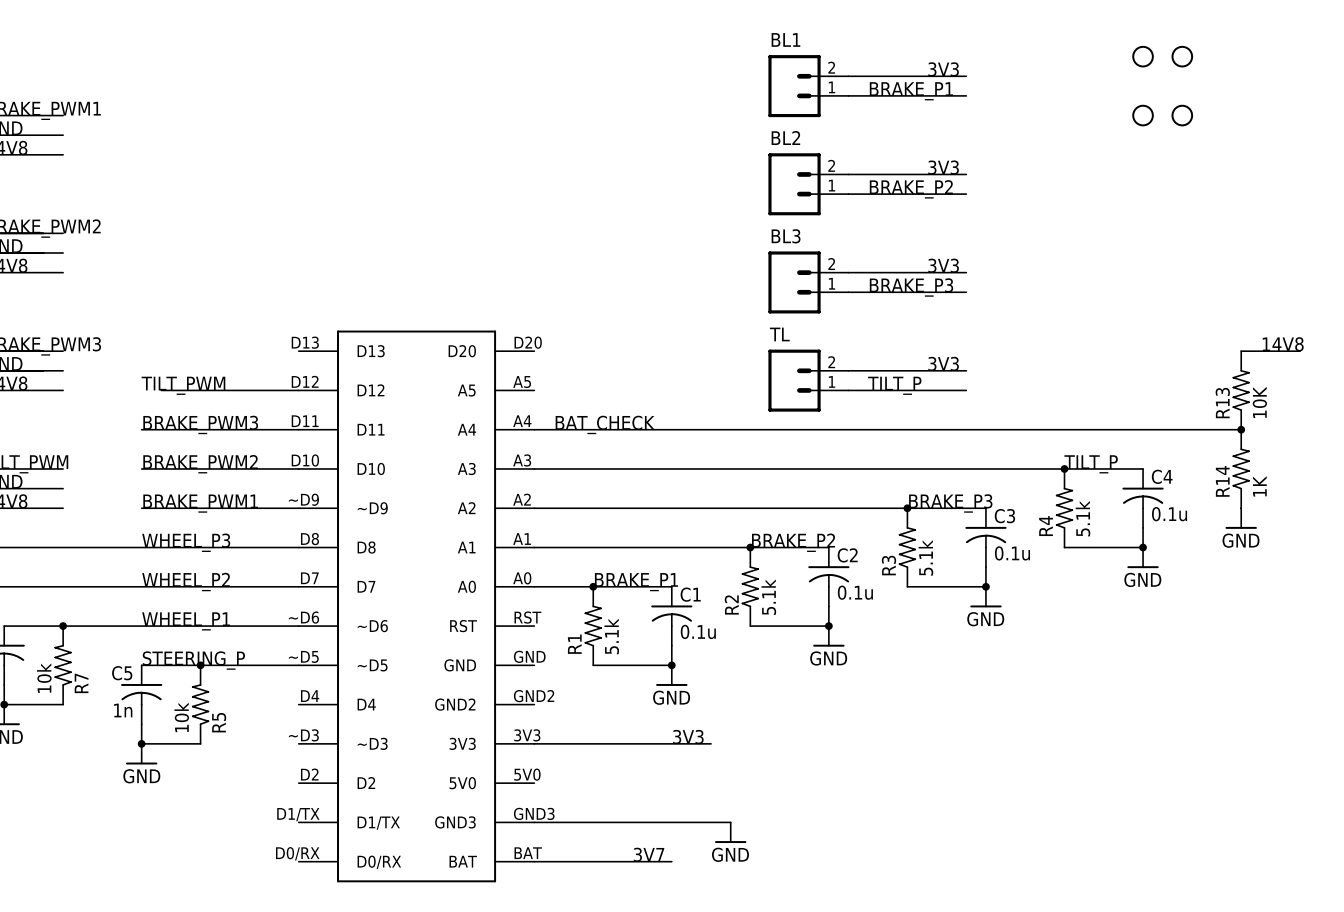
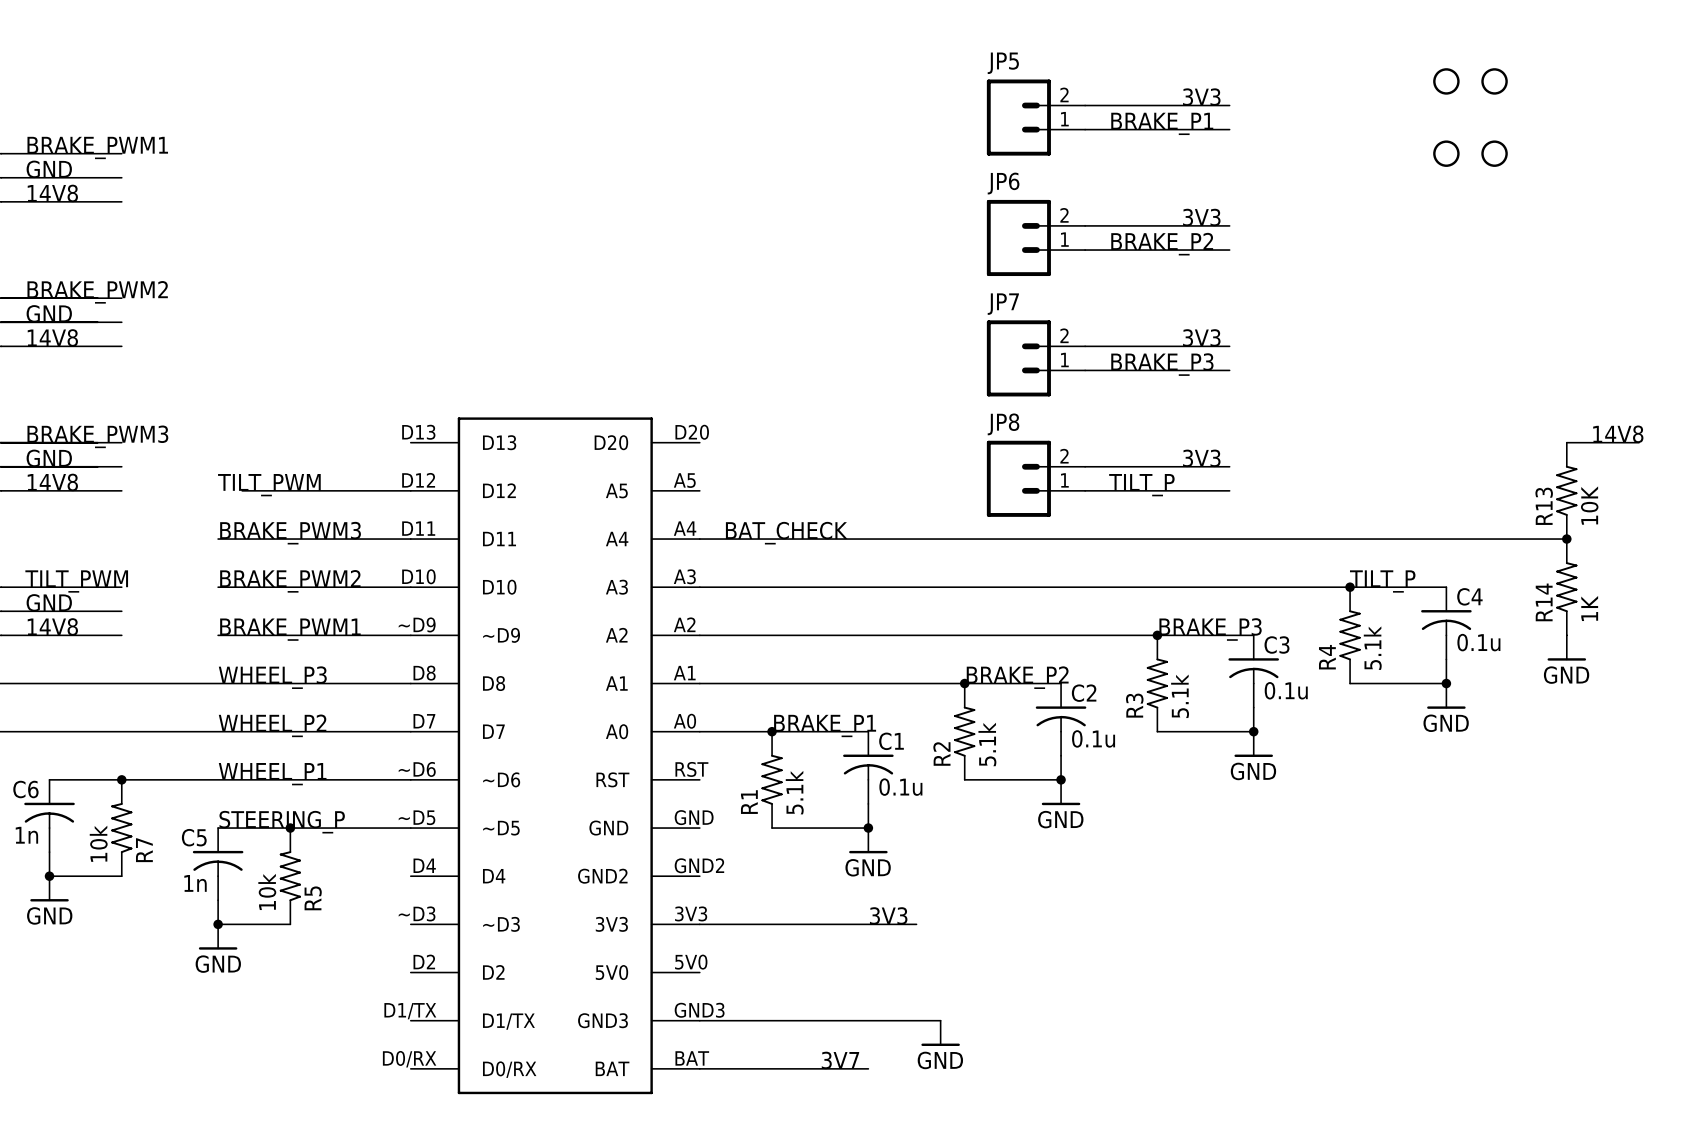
BL1 name: BL1 (785, 39) -> JP5 (1003, 63)
BL2 name: BL2 (785, 138) -> JP6 (1003, 183)
BL3 name: BL3 (786, 236) -> JP7 (1003, 304)
TL name: TL (779, 334) -> JP8 (1003, 424)

